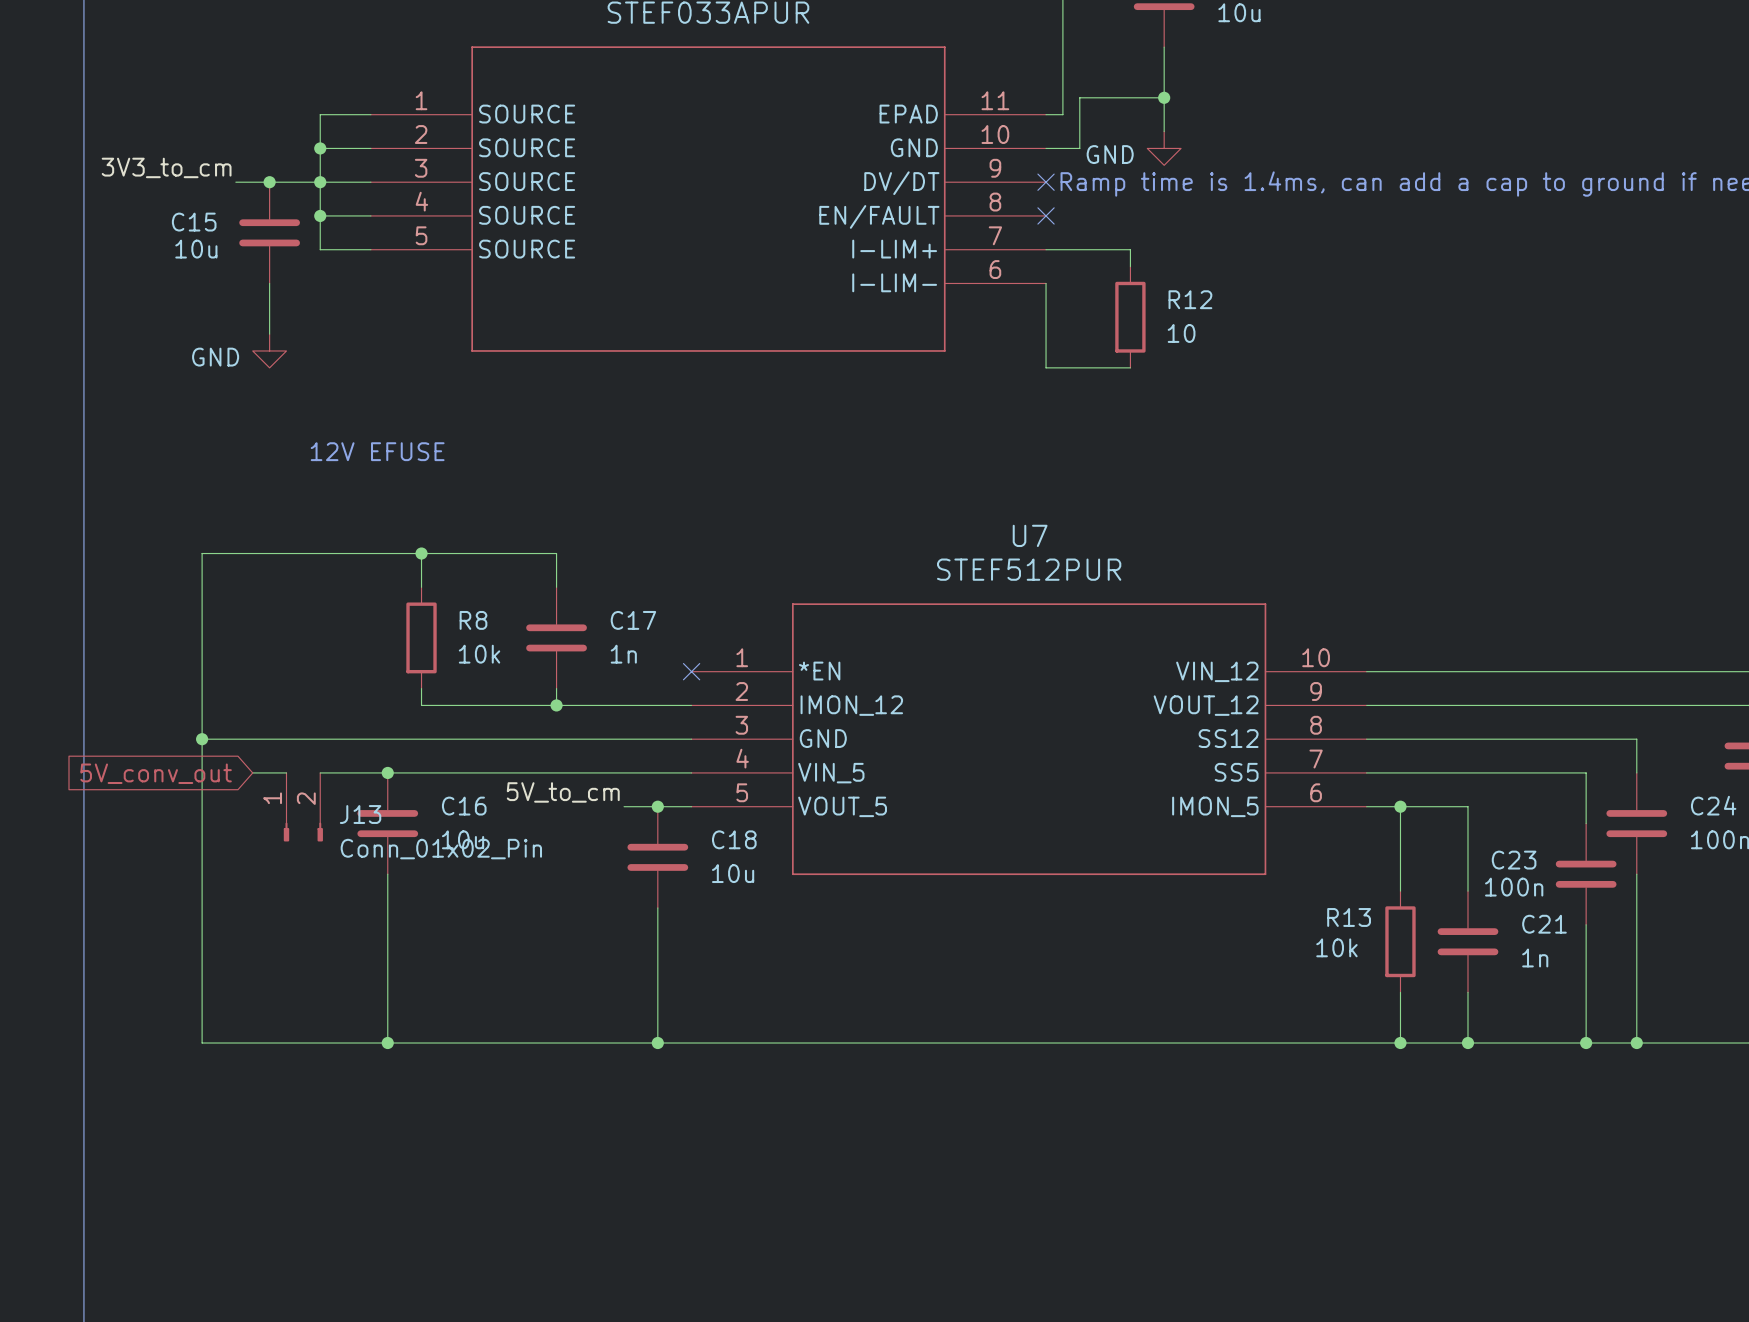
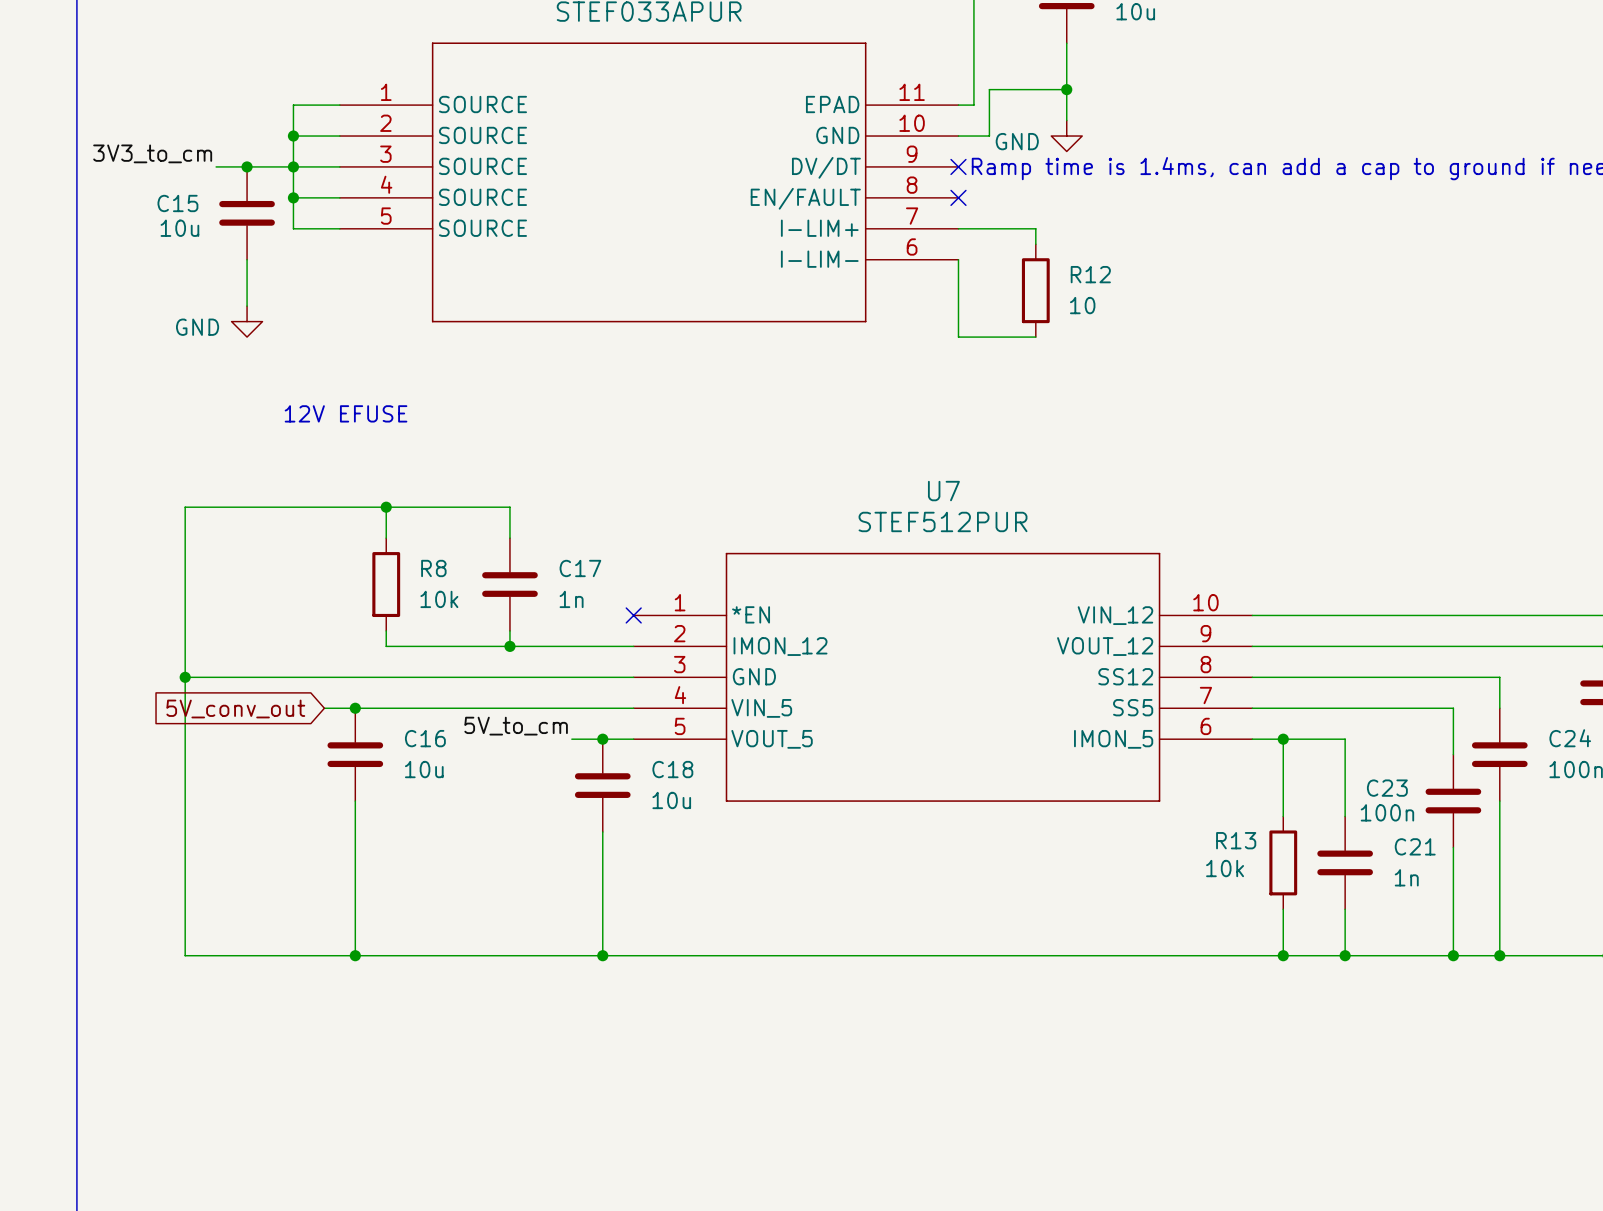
wire: (252, 772) (286, 772) -> none
wire: (320, 772) (354, 772) -> none
global label position: 5V_conv_out (156, 773) -> 5V_conv_out (235, 708)
J13: Conn_01x02_Pin (303, 807) -> none

